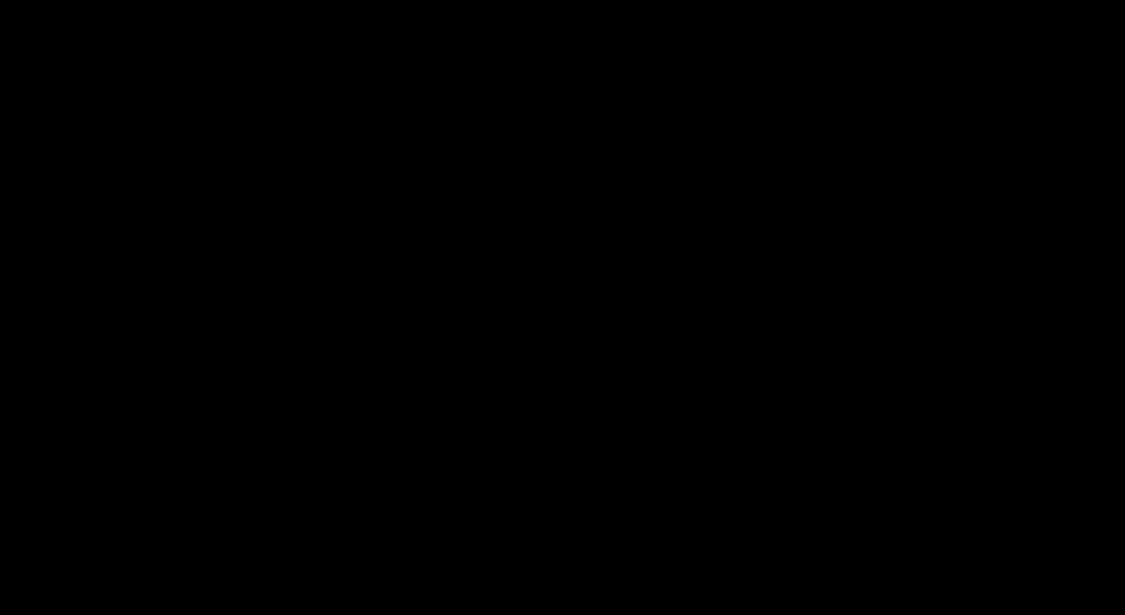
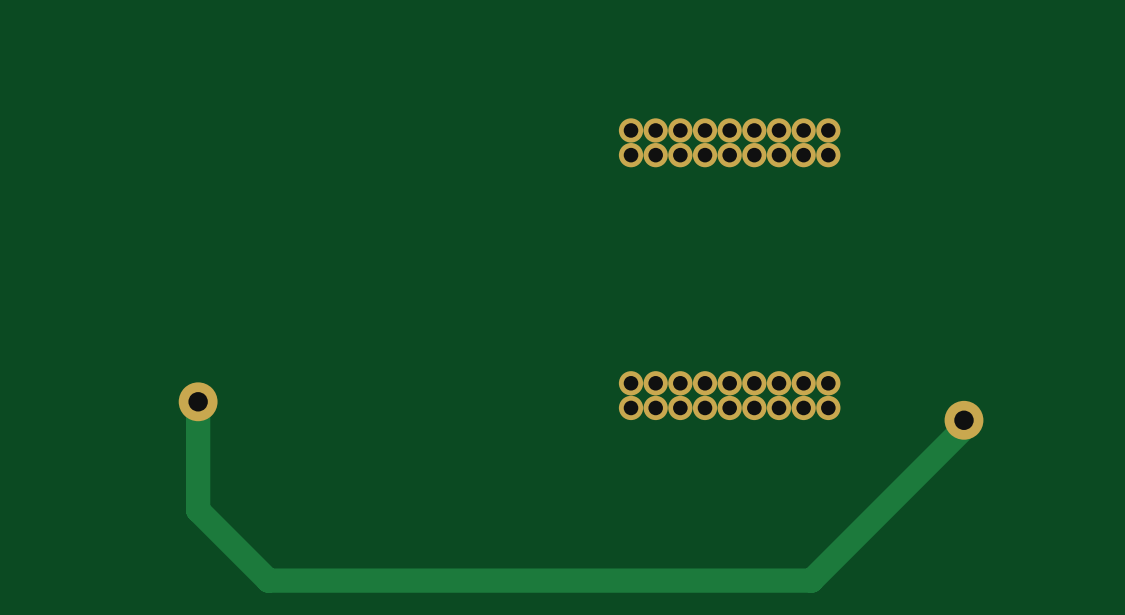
via: none -> (631, 130)
via: none -> (655, 130)
via: none -> (680, 130)
via: none -> (705, 130)
via: none -> (729, 130)
via: none -> (754, 130)
via: none -> (779, 130)
via: none -> (803, 130)
via: none -> (828, 130)
via: none -> (631, 155)
via: none -> (655, 155)
via: none -> (680, 155)
via: none -> (705, 155)
via: none -> (729, 155)
via: none -> (754, 155)
via: none -> (779, 155)
via: none -> (803, 155)
via: none -> (828, 155)
via: none -> (631, 383)
via: none -> (655, 383)
via: none -> (680, 383)
via: none -> (705, 383)
via: none -> (729, 383)
via: none -> (754, 383)
via: none -> (779, 383)
via: none -> (803, 383)
via: none -> (828, 383)
track: none -> (198, 401) (198, 510) (268, 580) (811, 580) (963, 428) (963, 420)
via: none -> (198, 401)
via: none -> (631, 407)
via: none -> (655, 407)
via: none -> (680, 407)
via: none -> (705, 407)
via: none -> (729, 407)
via: none -> (754, 407)
via: none -> (779, 407)
via: none -> (803, 407)
via: none -> (828, 407)
via: none -> (963, 420)

